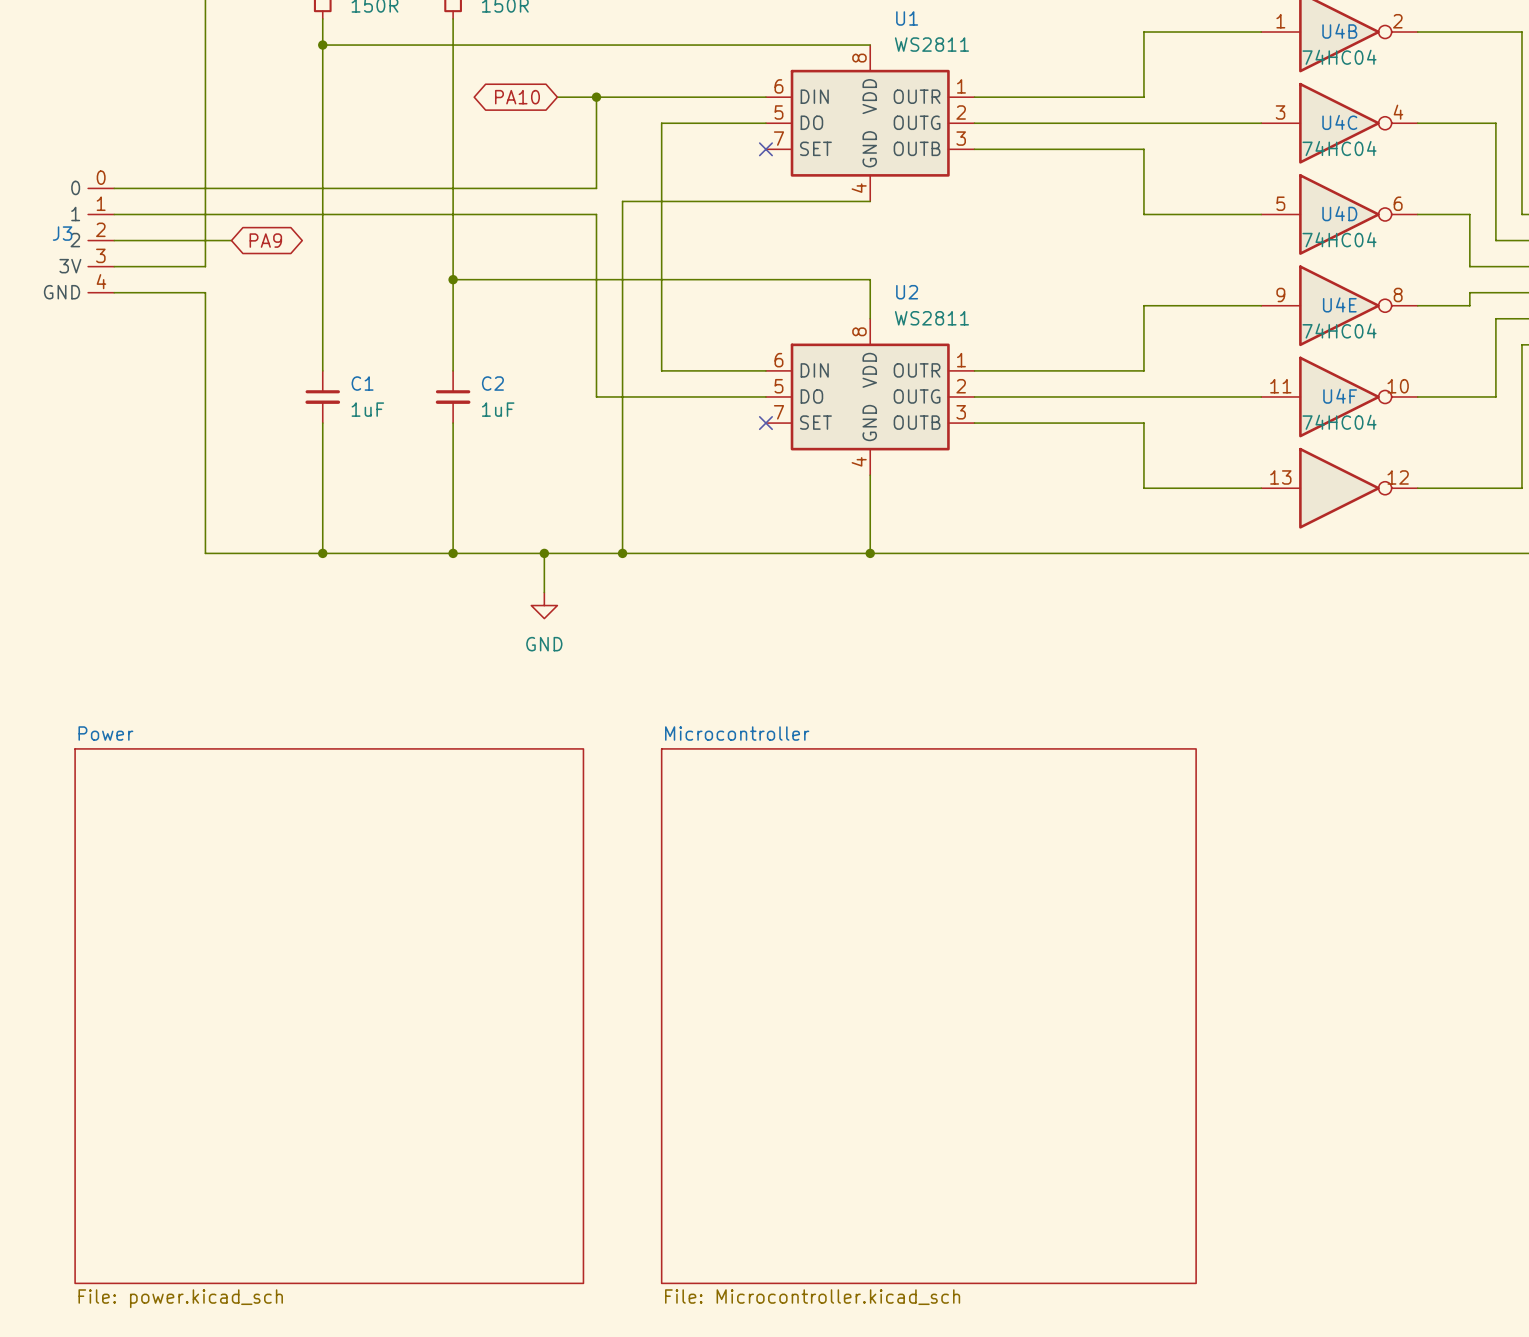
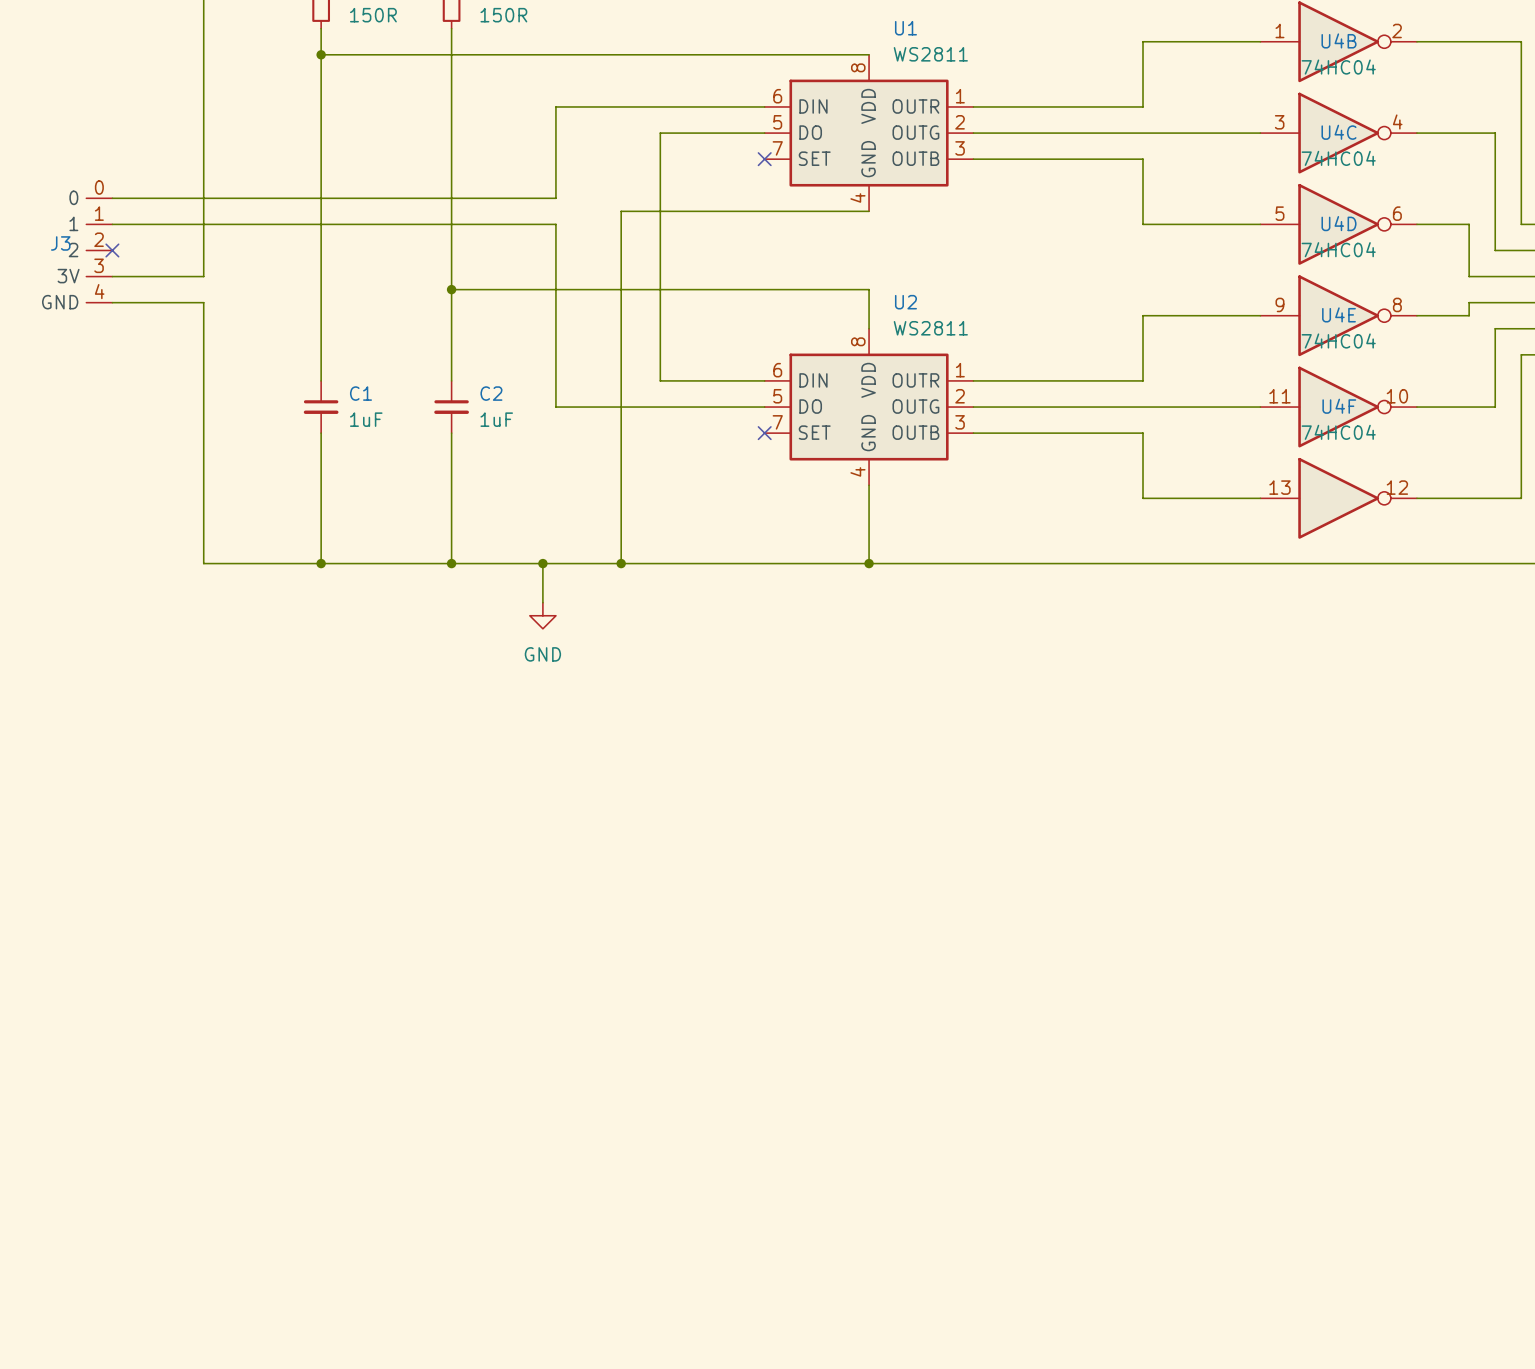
global label: PA10 (517, 97) -> none
wire: (596, 97) (596, 188) (557, 188) -> (555, 106) (555, 198)
junction: (596, 97) -> none
wire: (557, 214) (596, 214) (596, 396) -> (555, 224) (555, 407) (595, 407)
wire: (114, 240) (231, 240) -> none
no-connect mark: none -> (112, 250)
global label: PA9 (265, 240) -> none
sheet Power: File: power.kicad_sch (329, 1016) -> none
sheet Microcontroller: File: Microcontroller.kicad_sch (928, 1016) -> none

